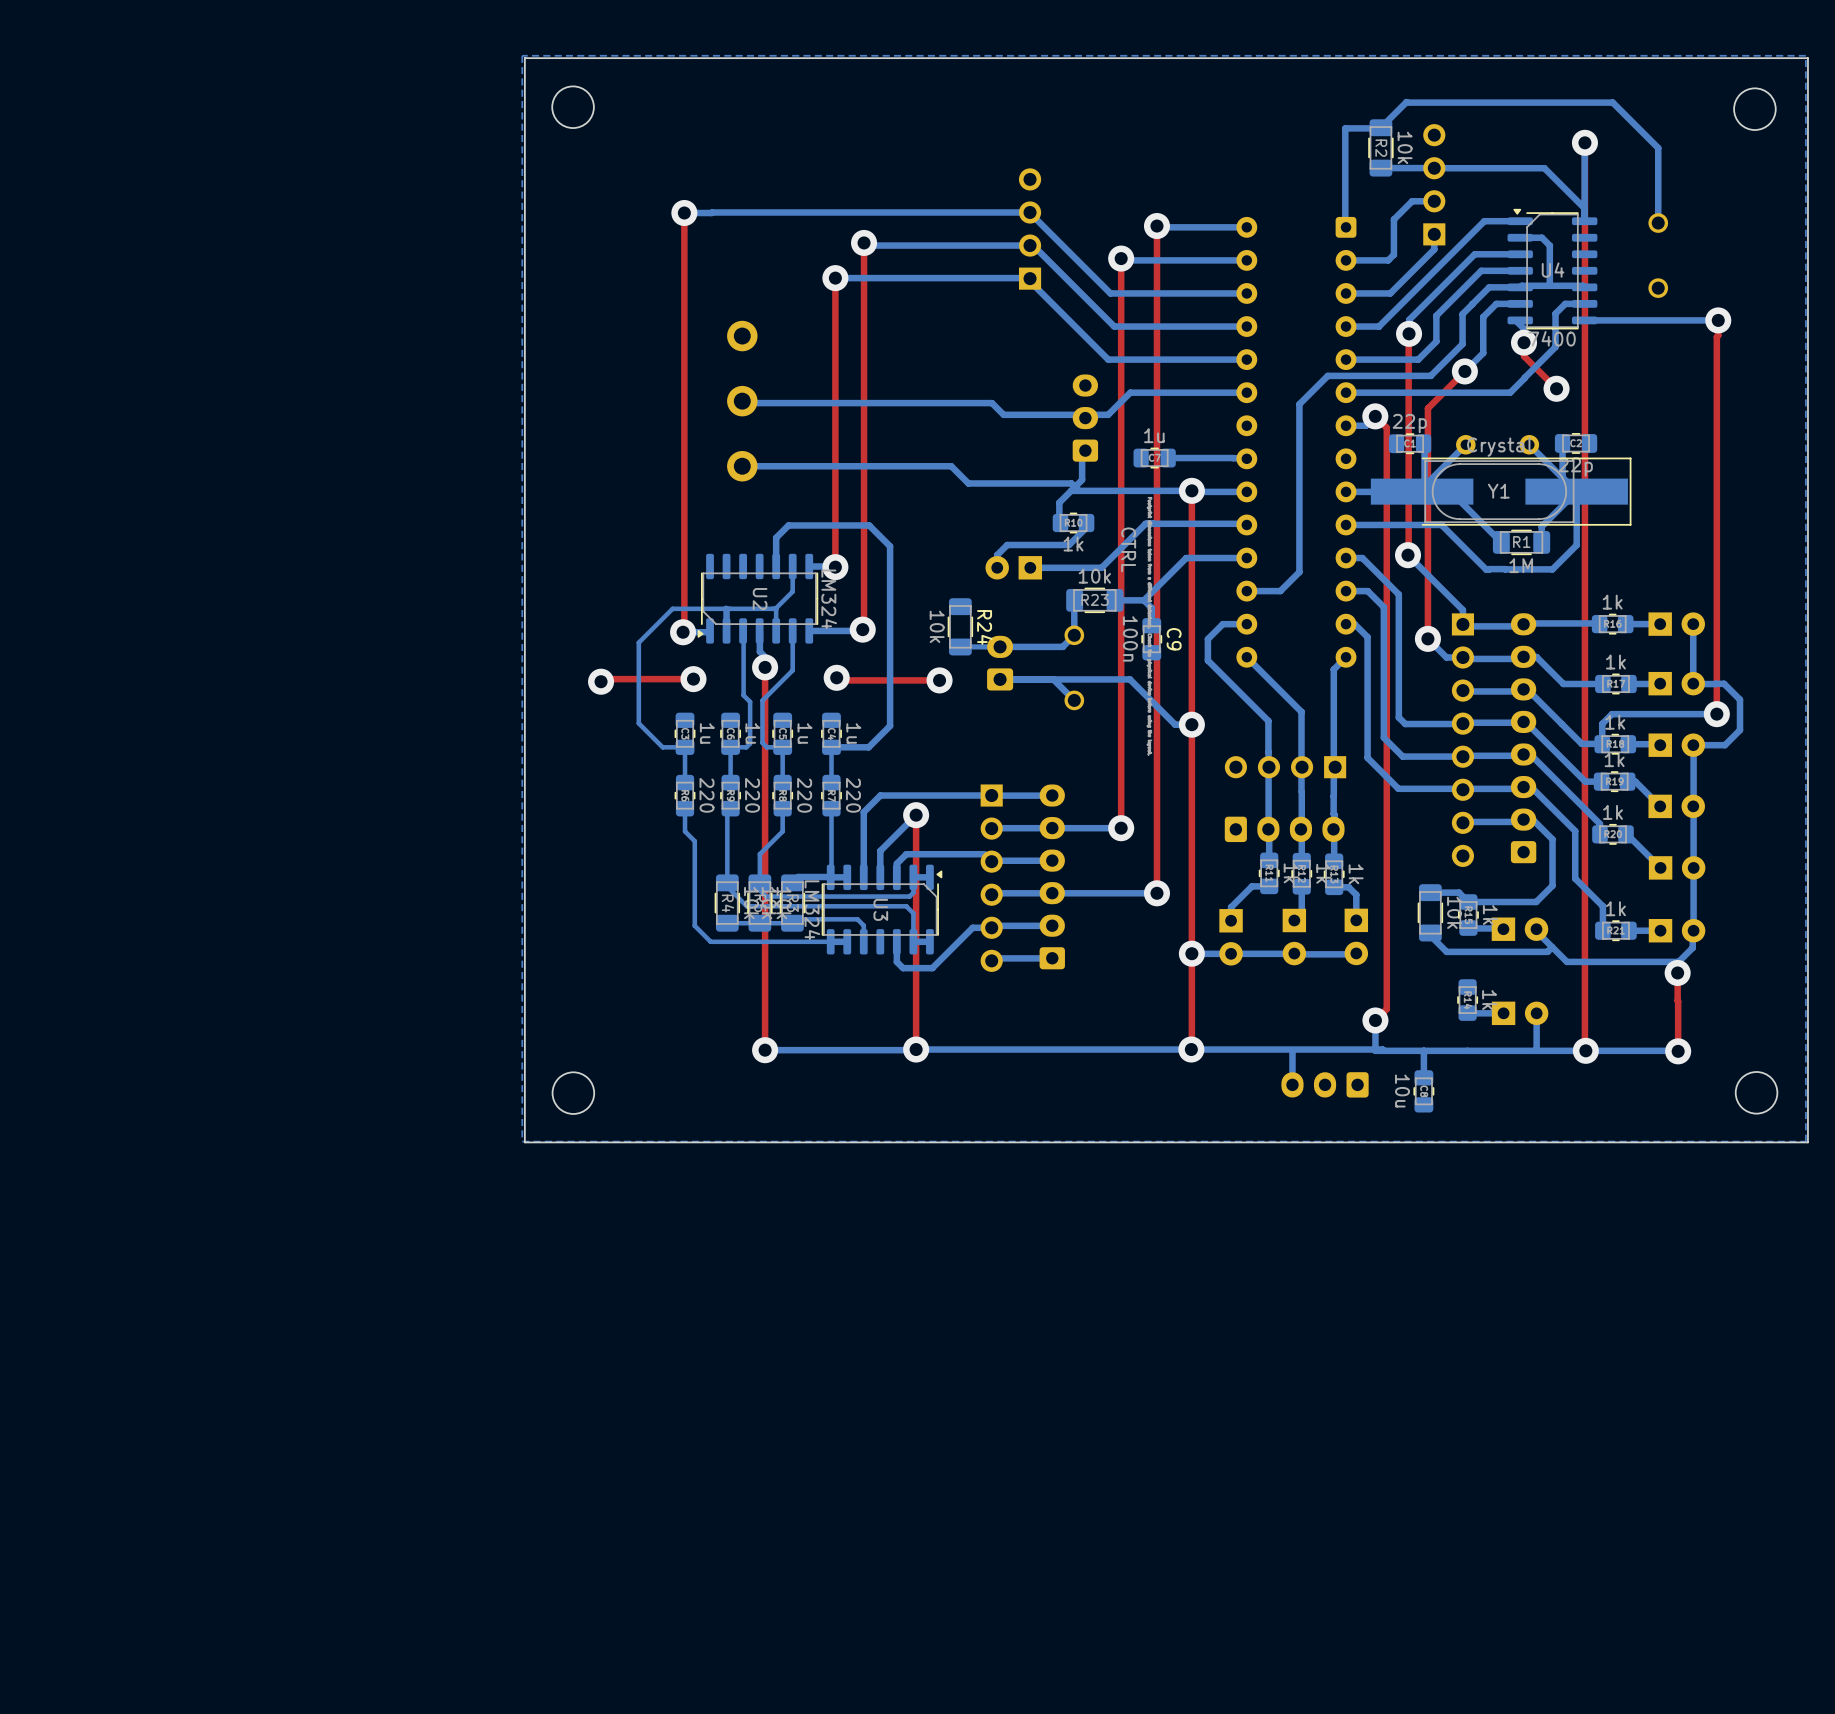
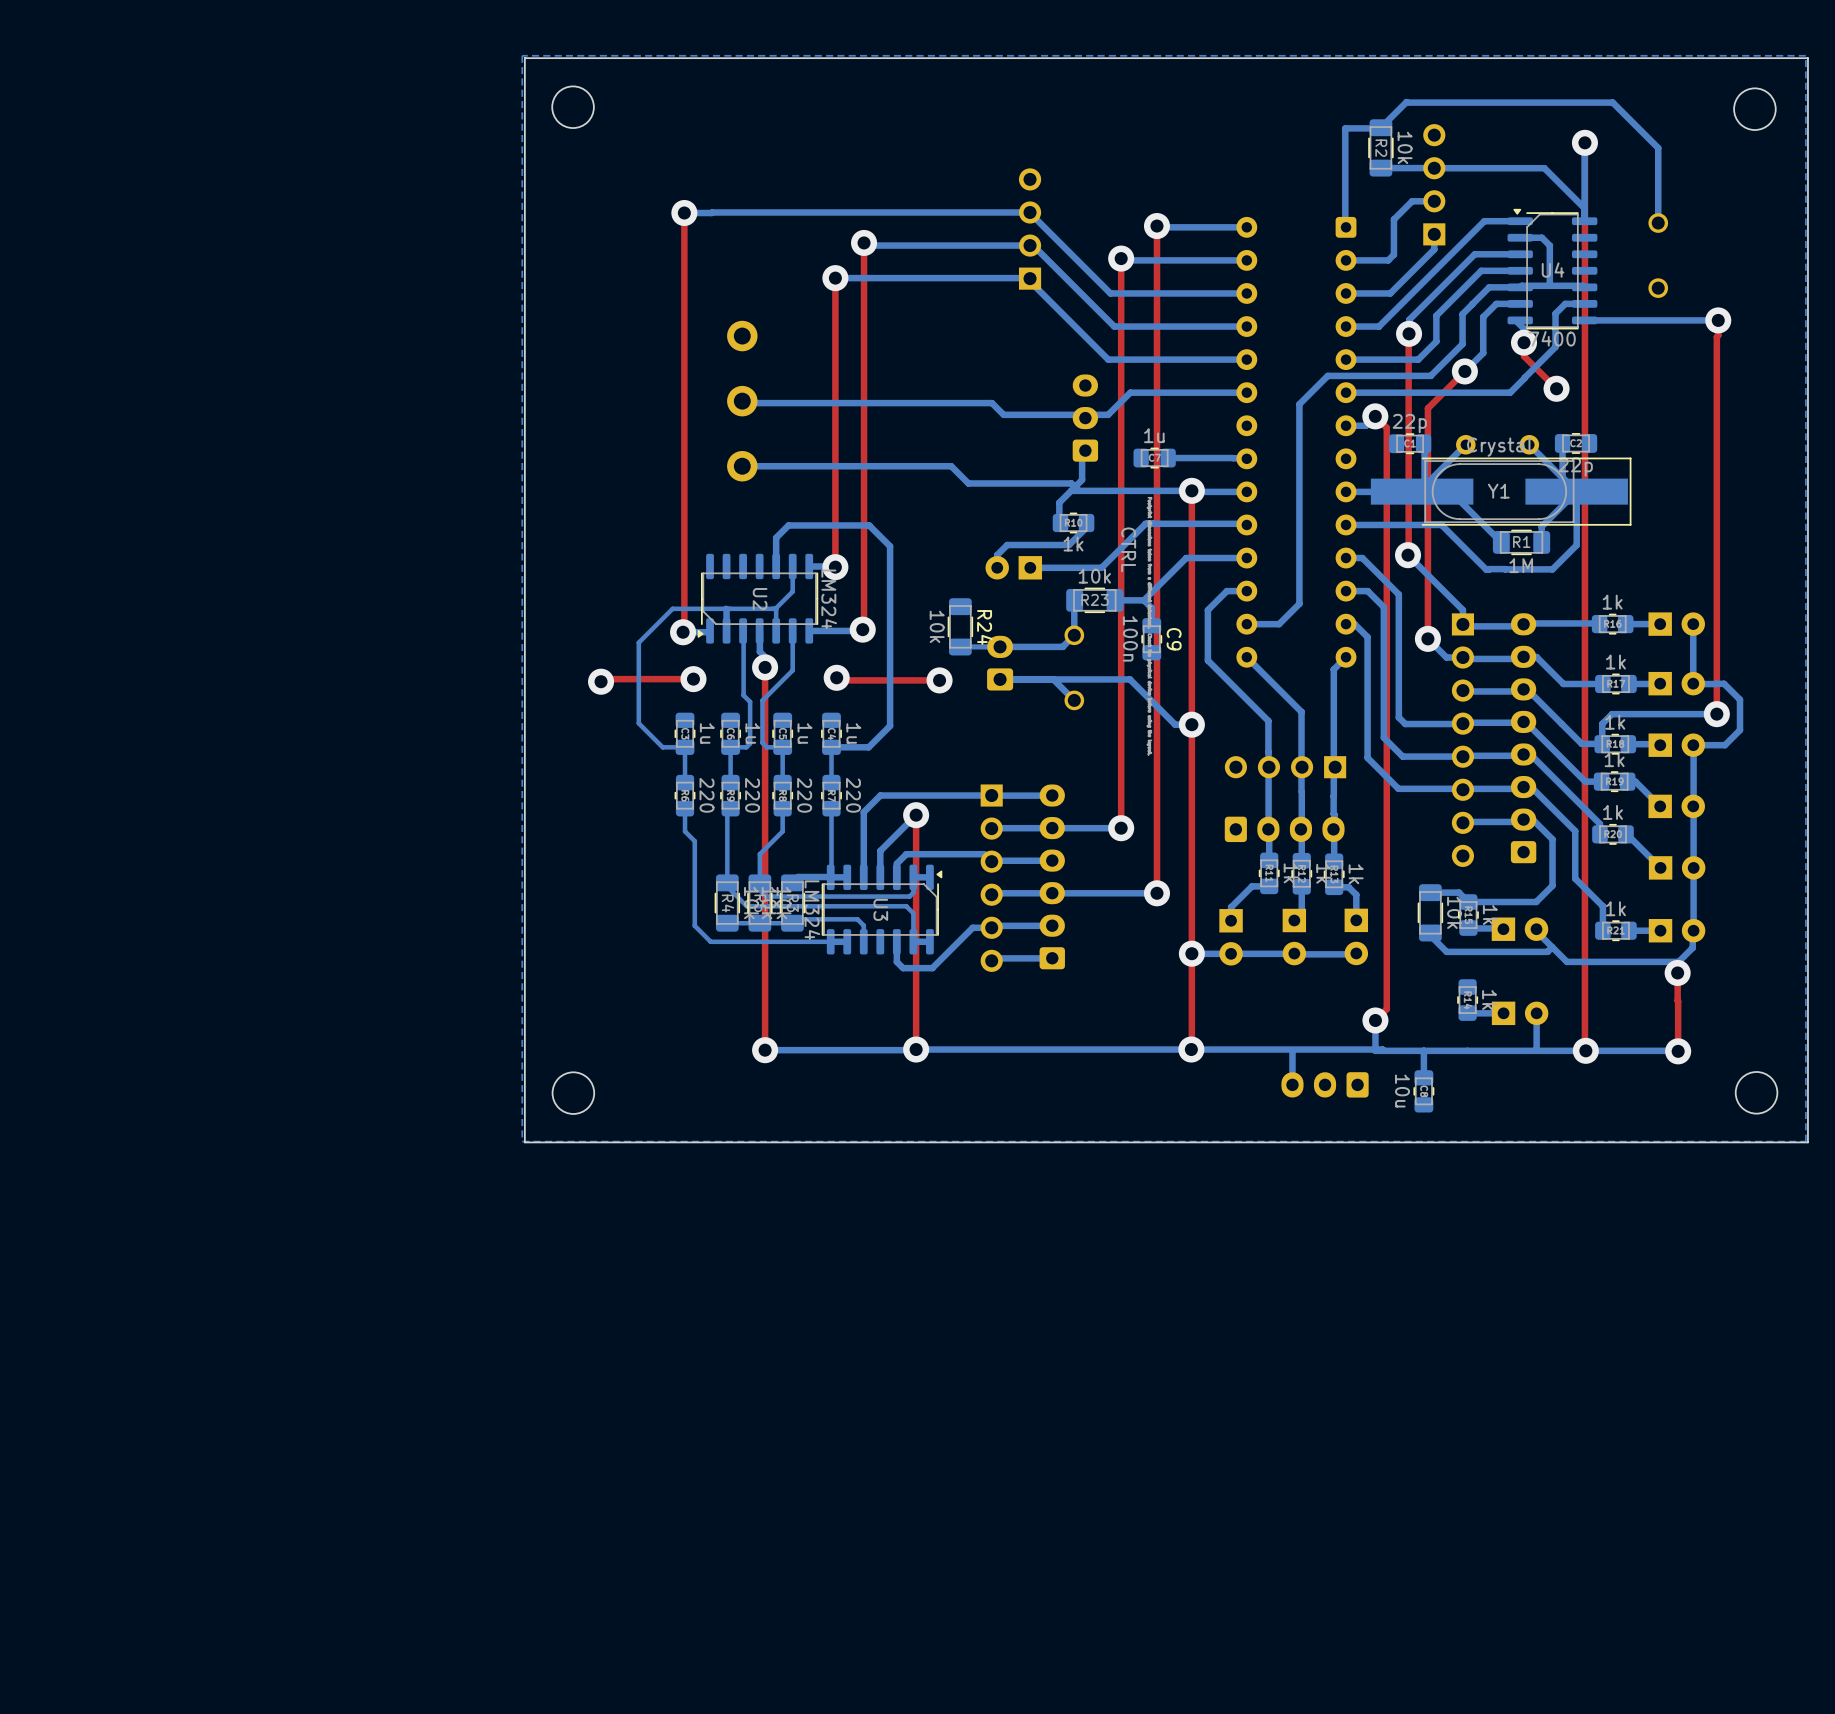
bottom track: (1299, 572) (1280, 591) (1246, 591) -> (1299, 572) (1299, 603) (1279, 624) (1246, 624)
bottom track: (1246, 624) (1222, 624) (1207, 639) -> (1246, 591) (1226, 591) (1207, 610) (1207, 639)

